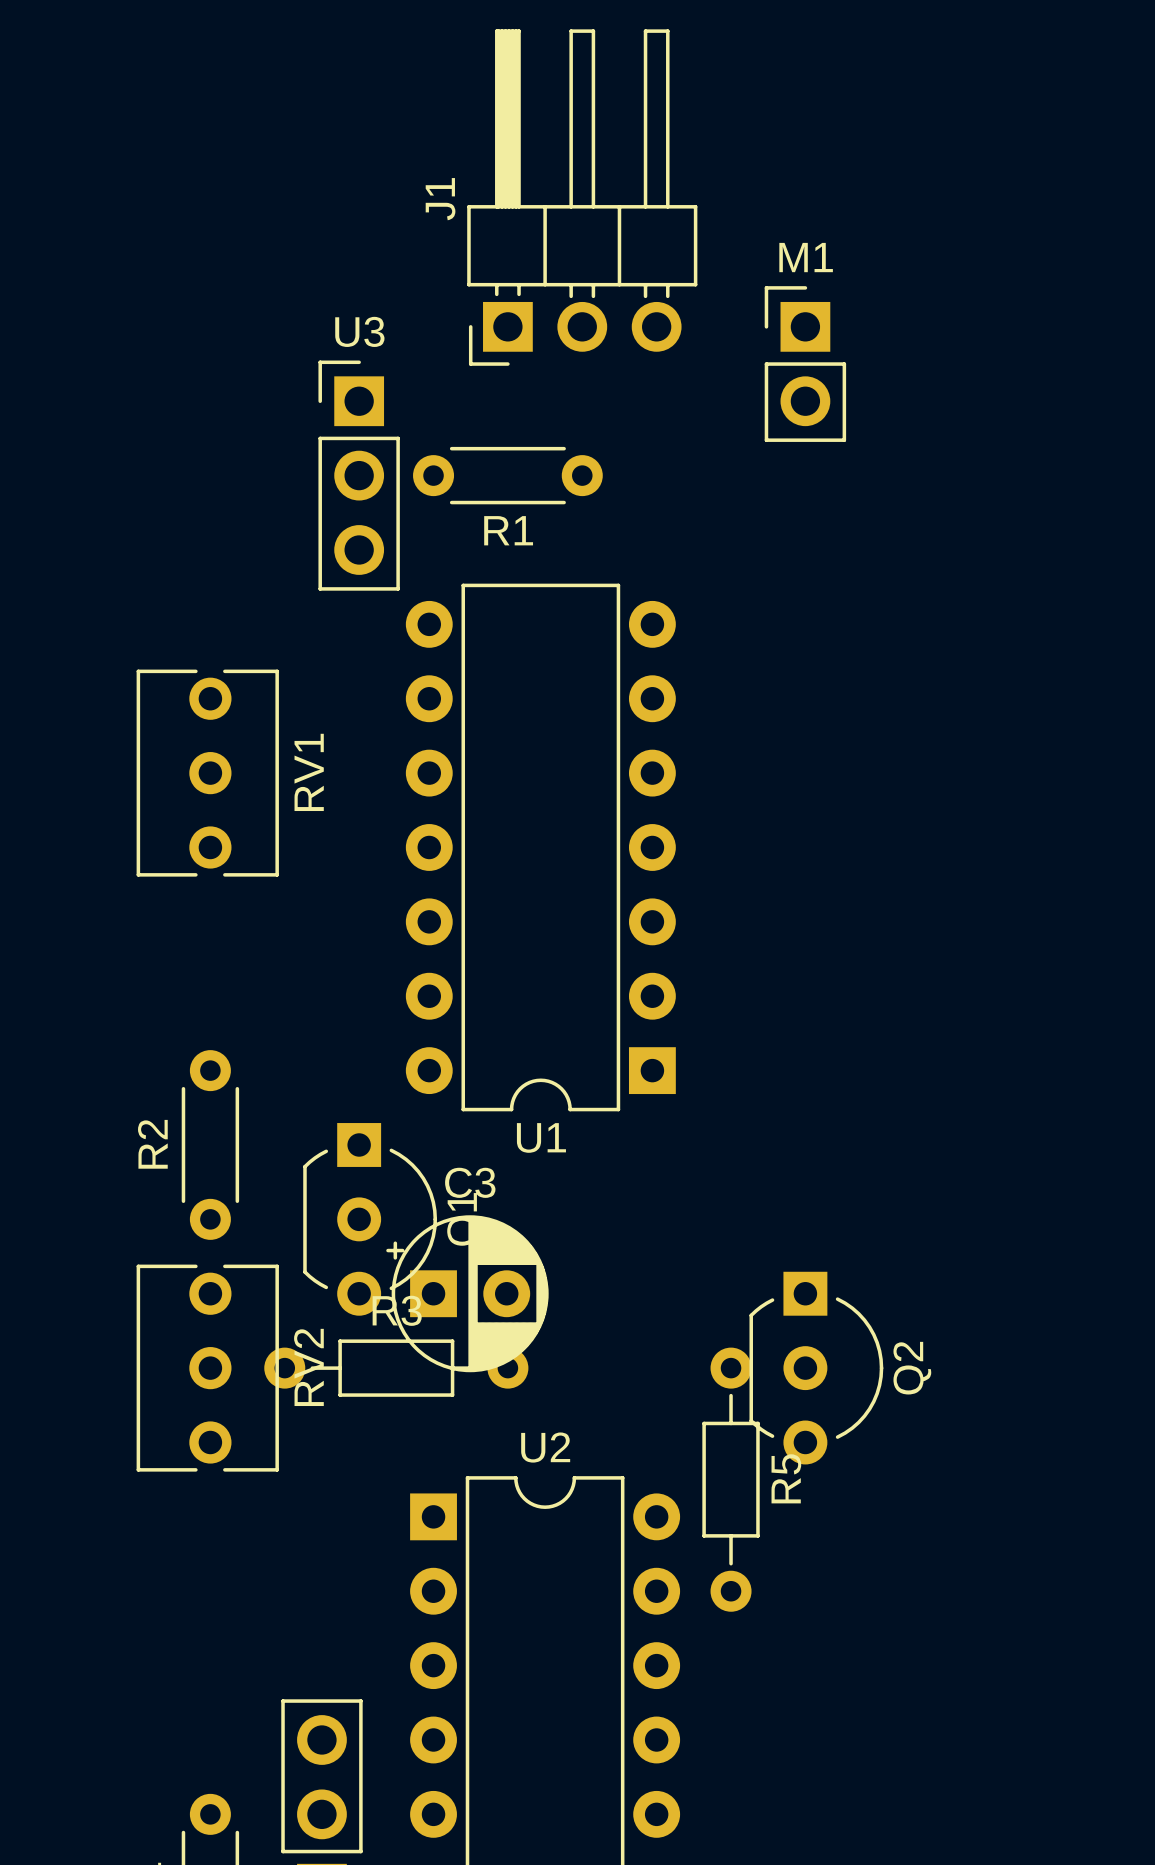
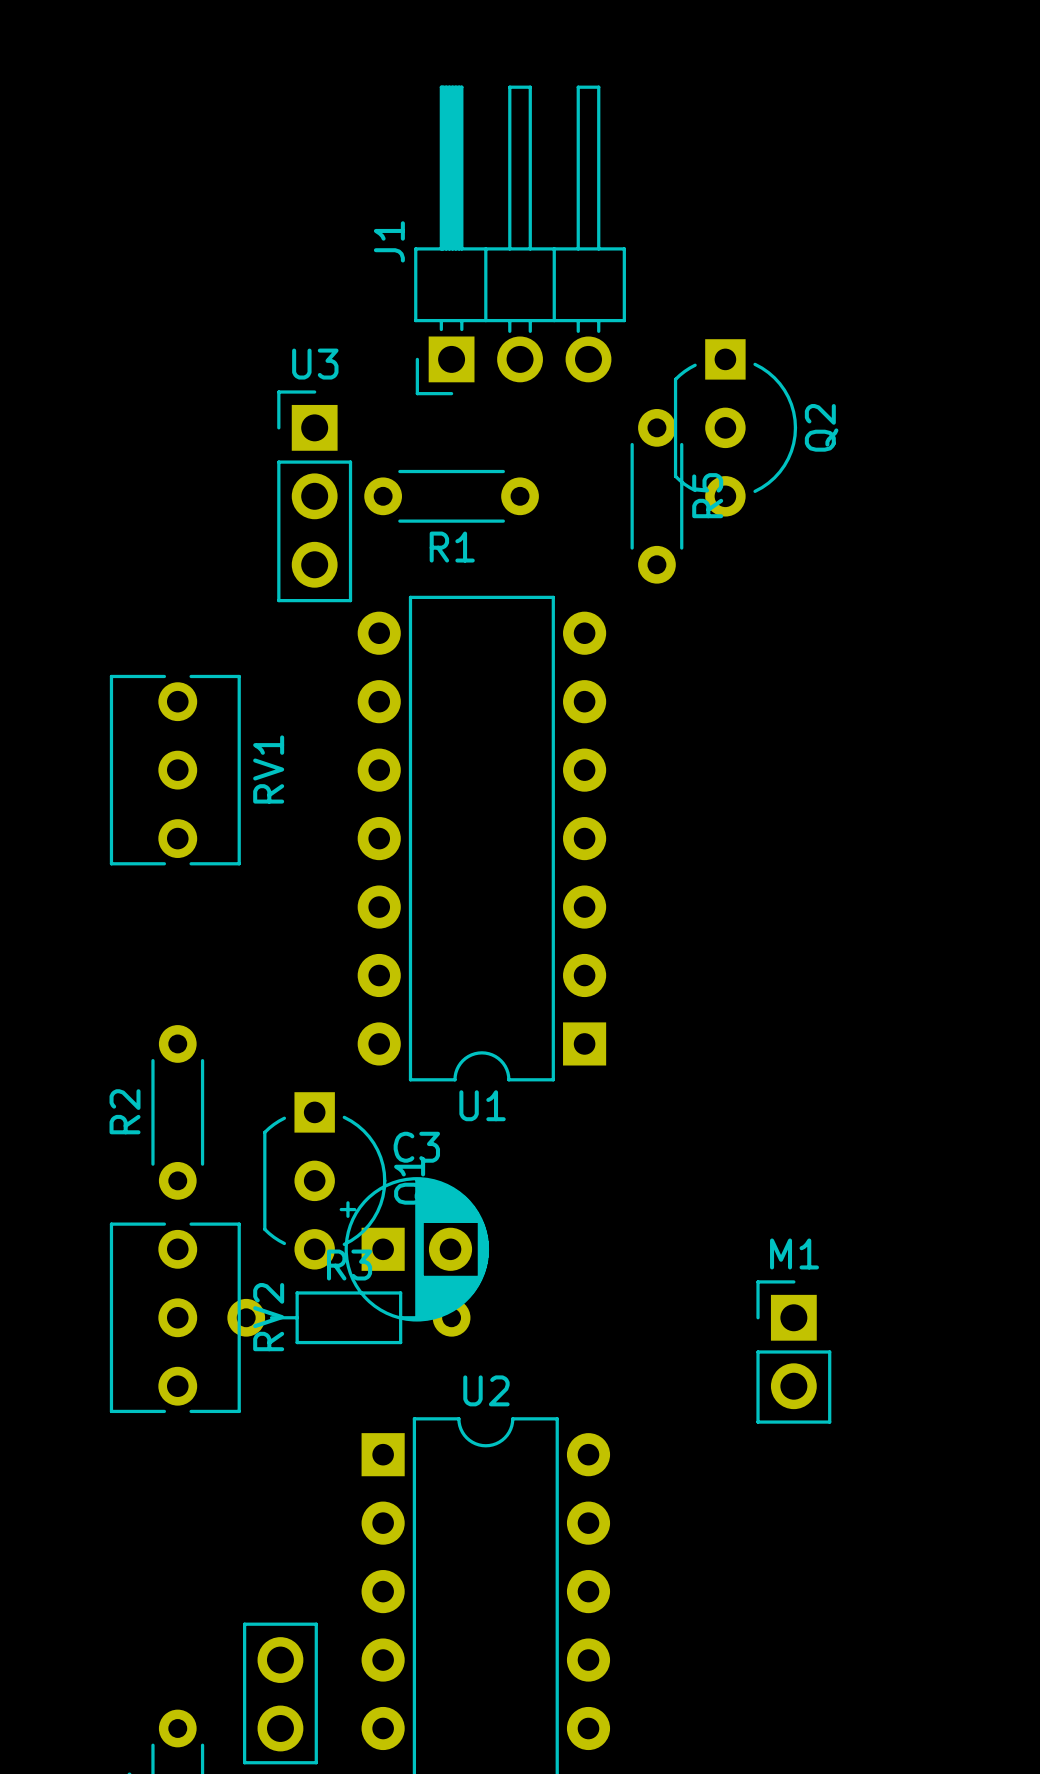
M1 position: (805, 364) -> (793, 1352)
R5 footprint: [702, 1347, 760, 1612] -> [630, 408, 684, 584]
Q2 position: (816, 1368) -> (735, 427)

